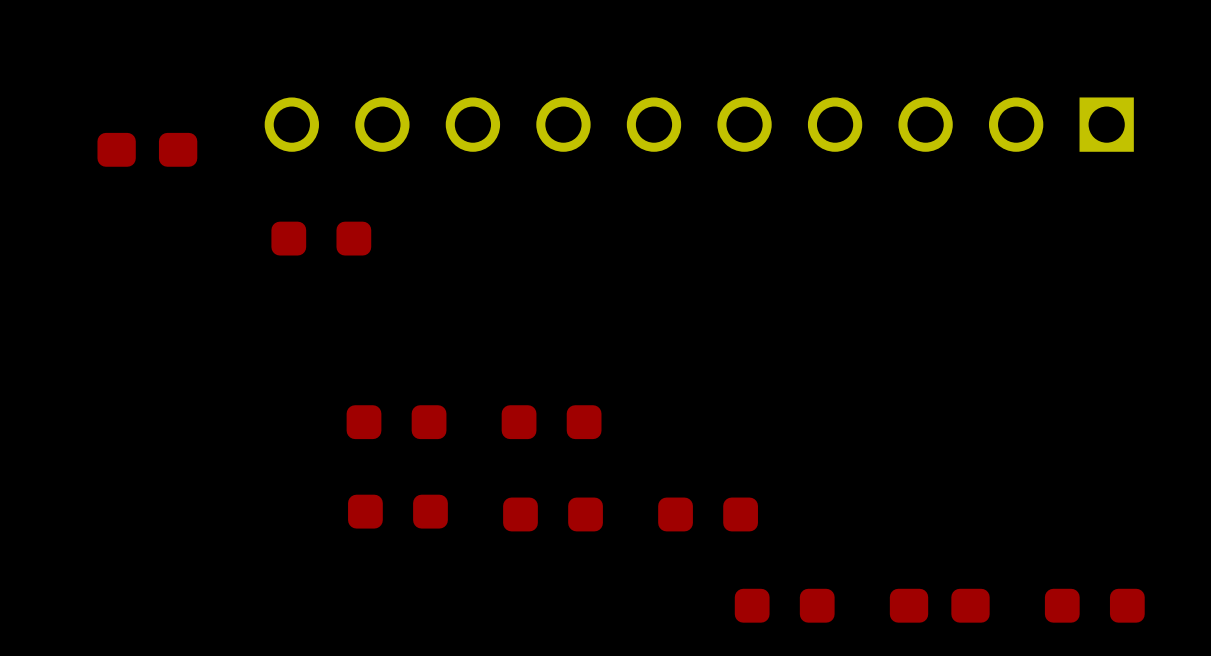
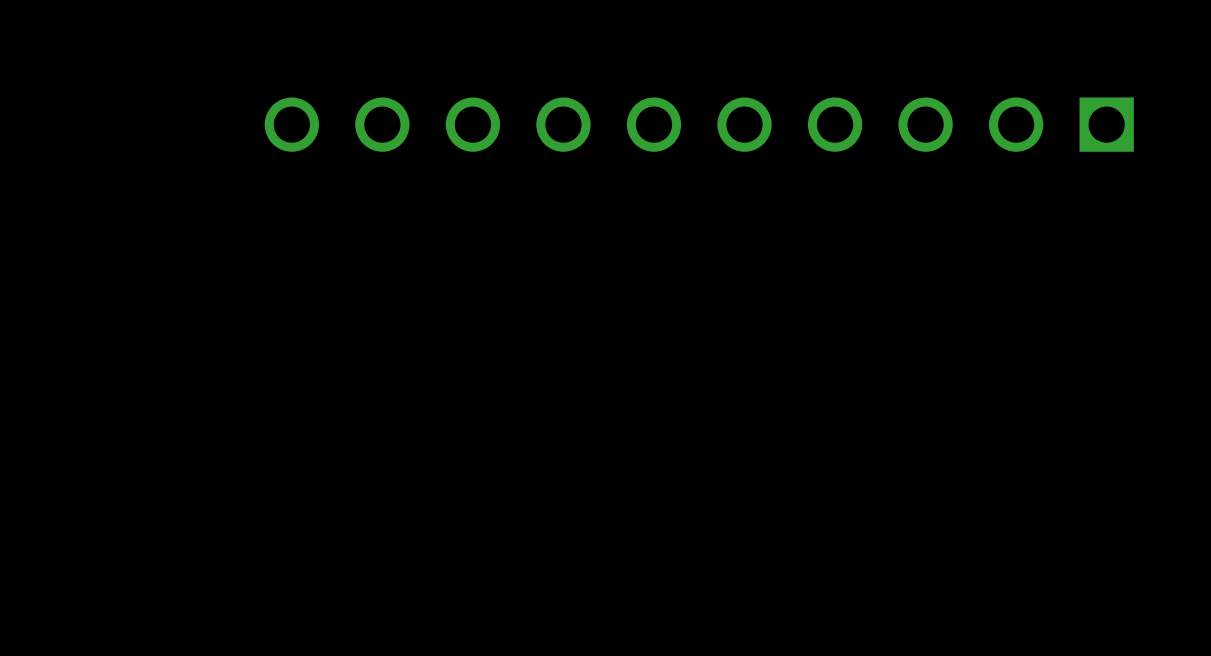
part: (147, 149) -> none
part: (321, 238) -> none
part: (396, 422) -> none
part: (551, 422) -> none
part: (397, 511) -> none
part: (553, 514) -> none
part: (708, 514) -> none
part: (784, 605) -> none
part: (939, 605) -> none
part: (1094, 605) -> none

